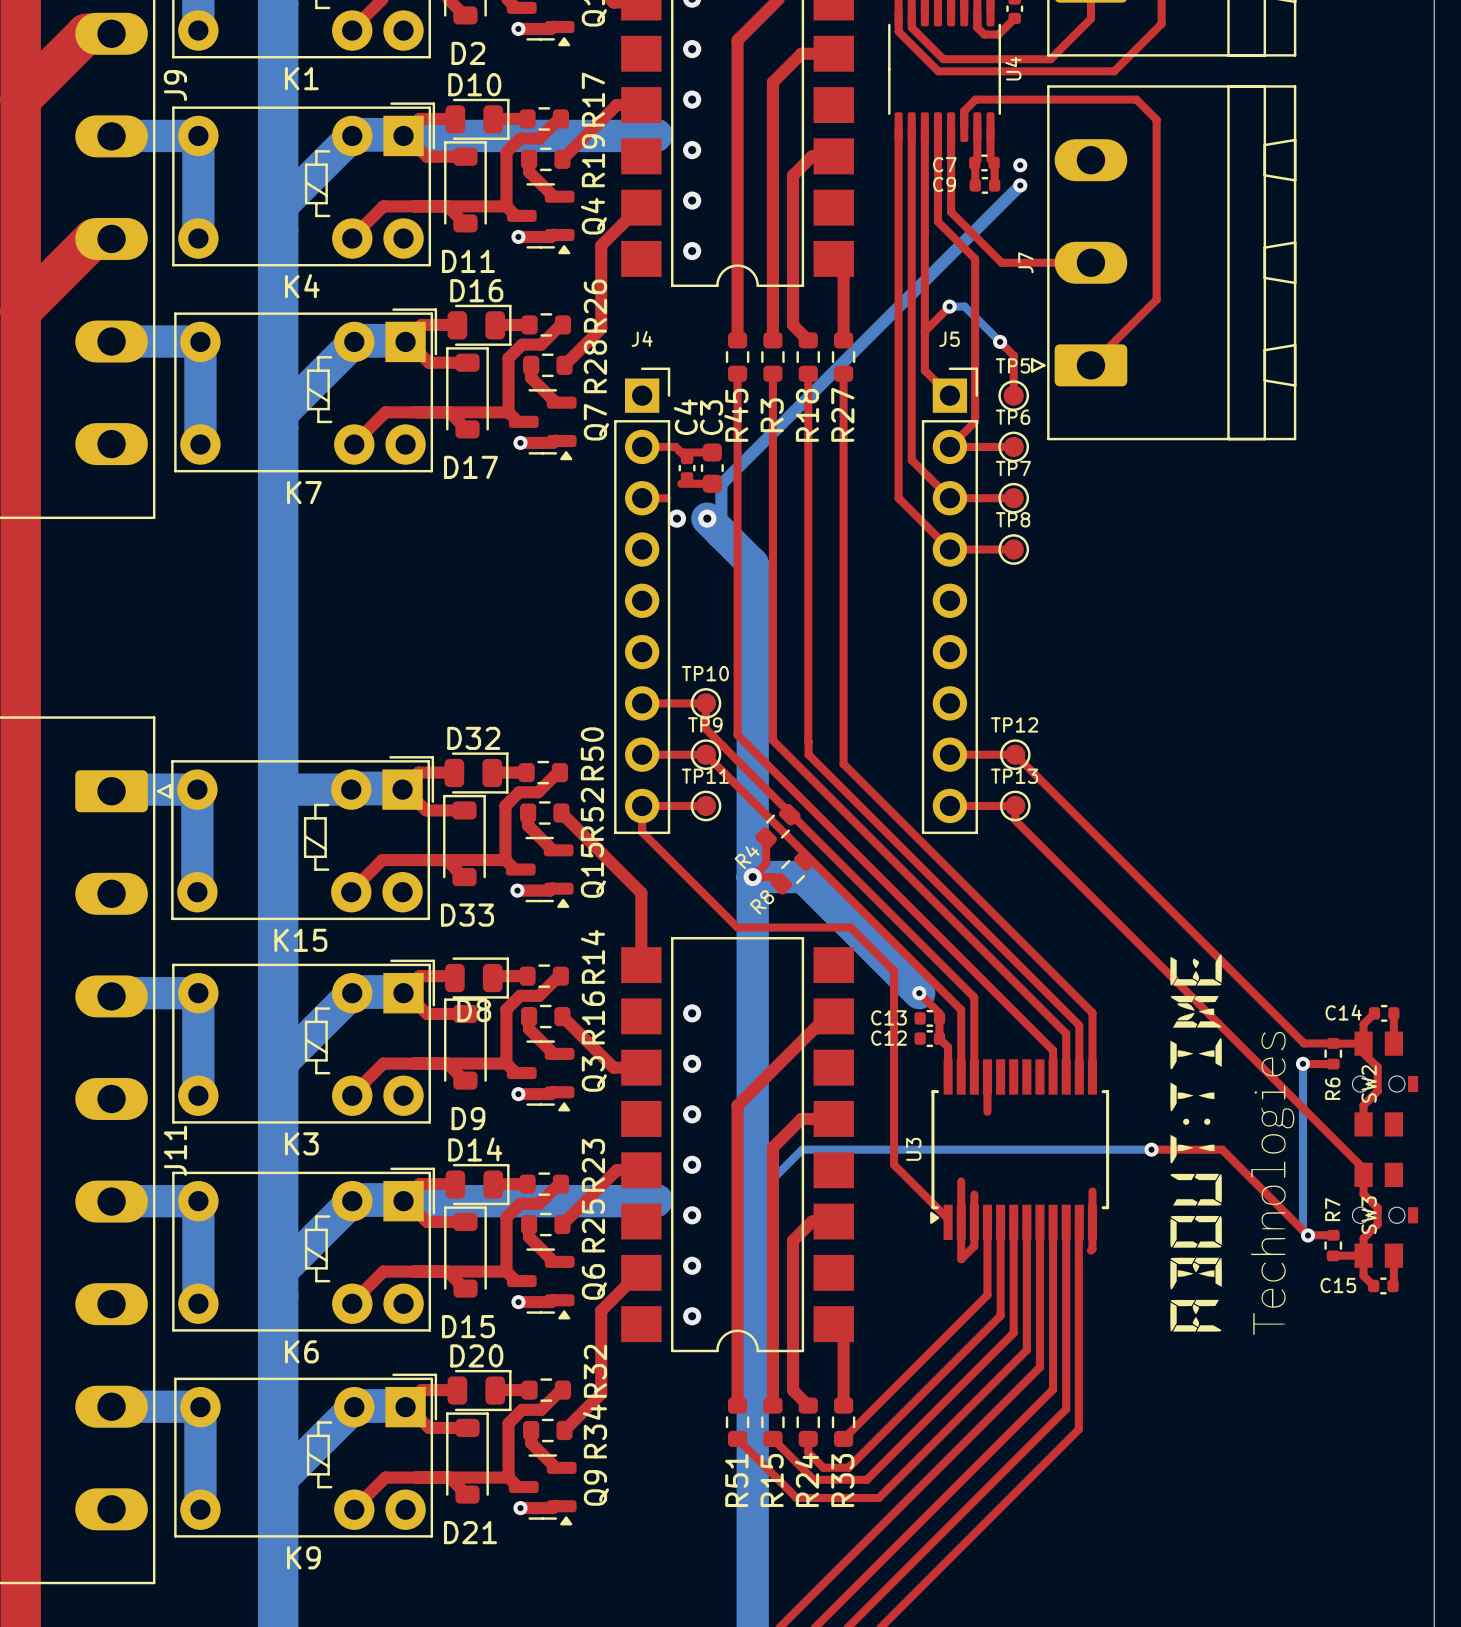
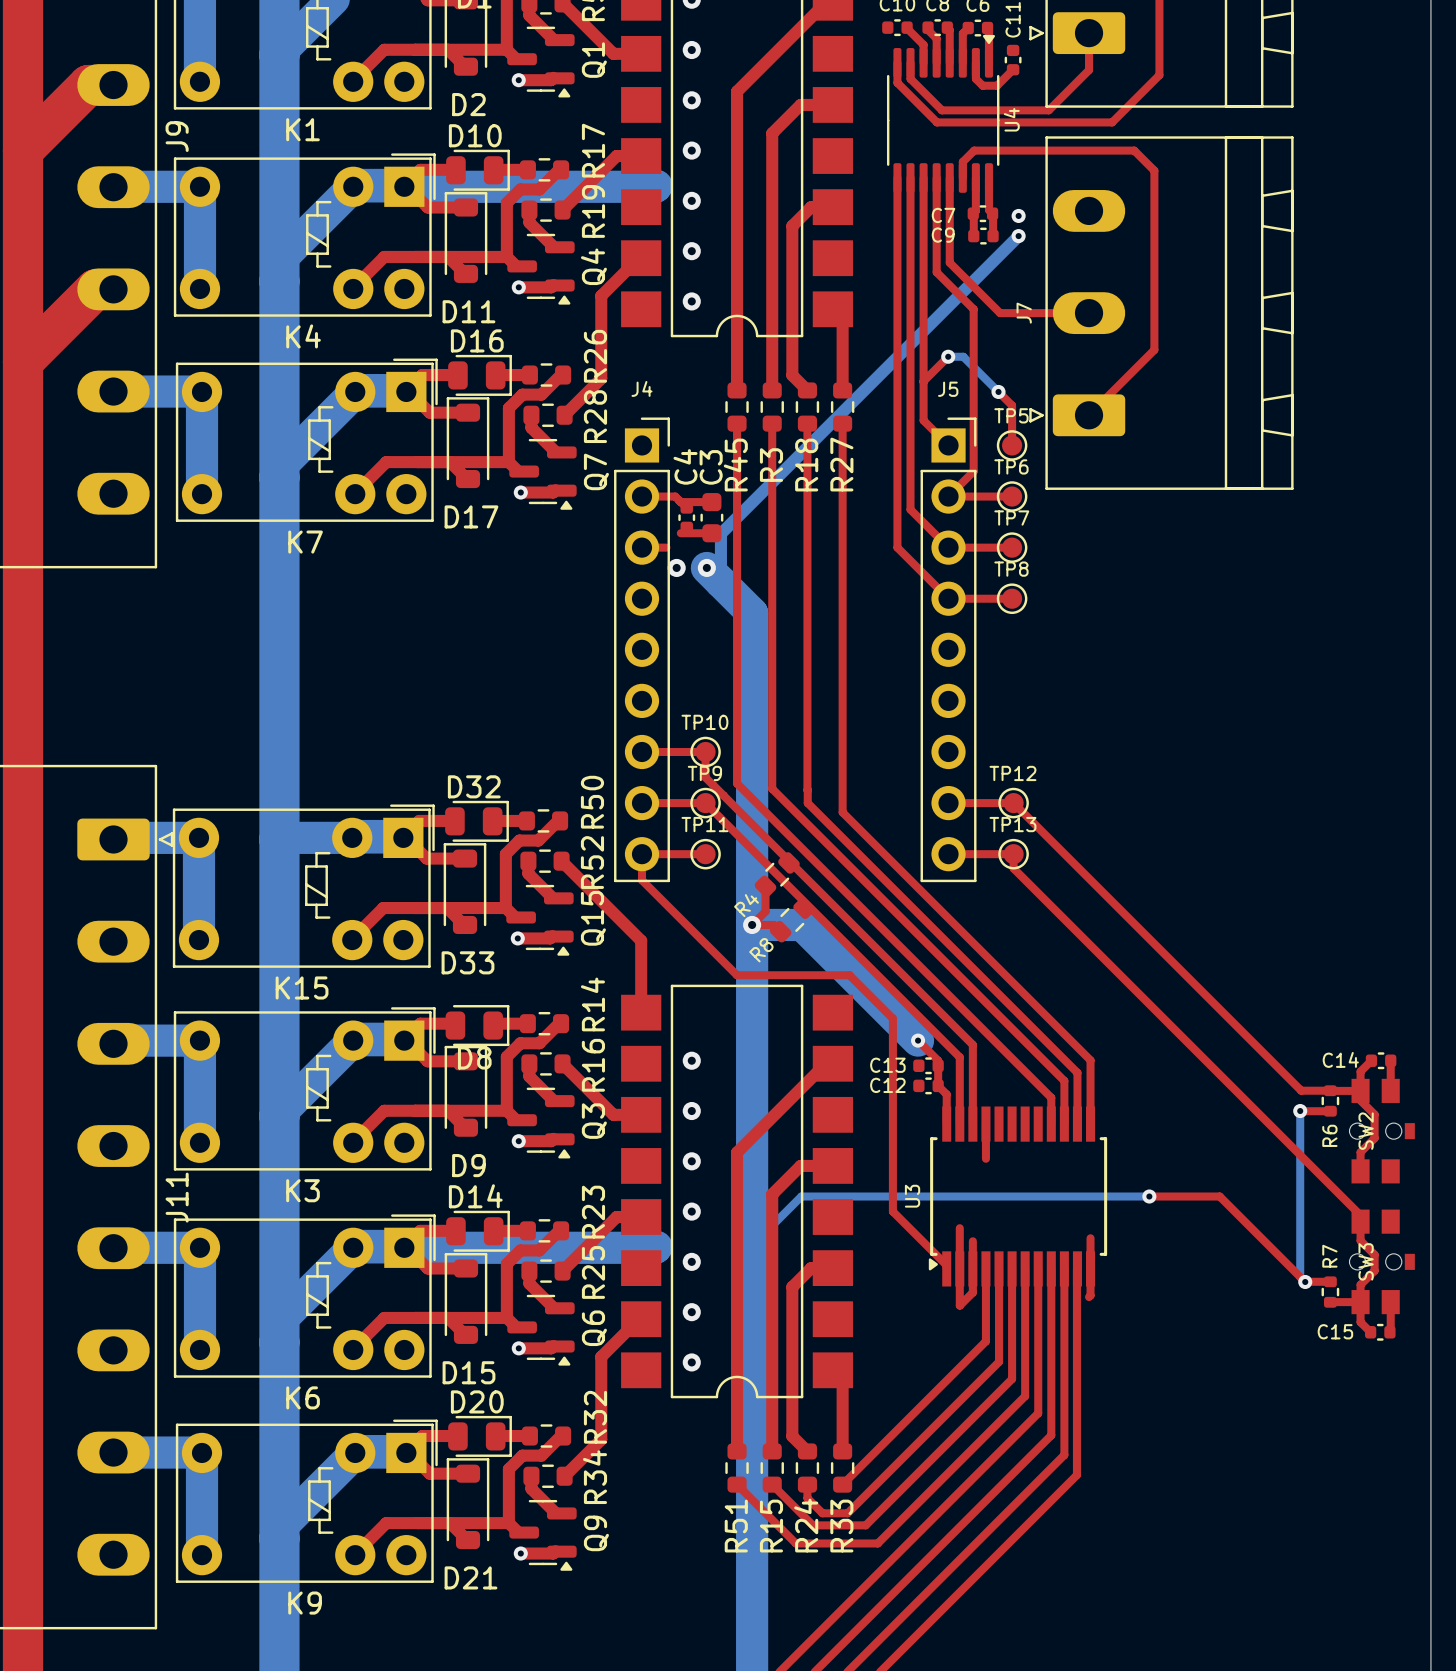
drawing: [1170, 954, 1295, 1335] -> none

